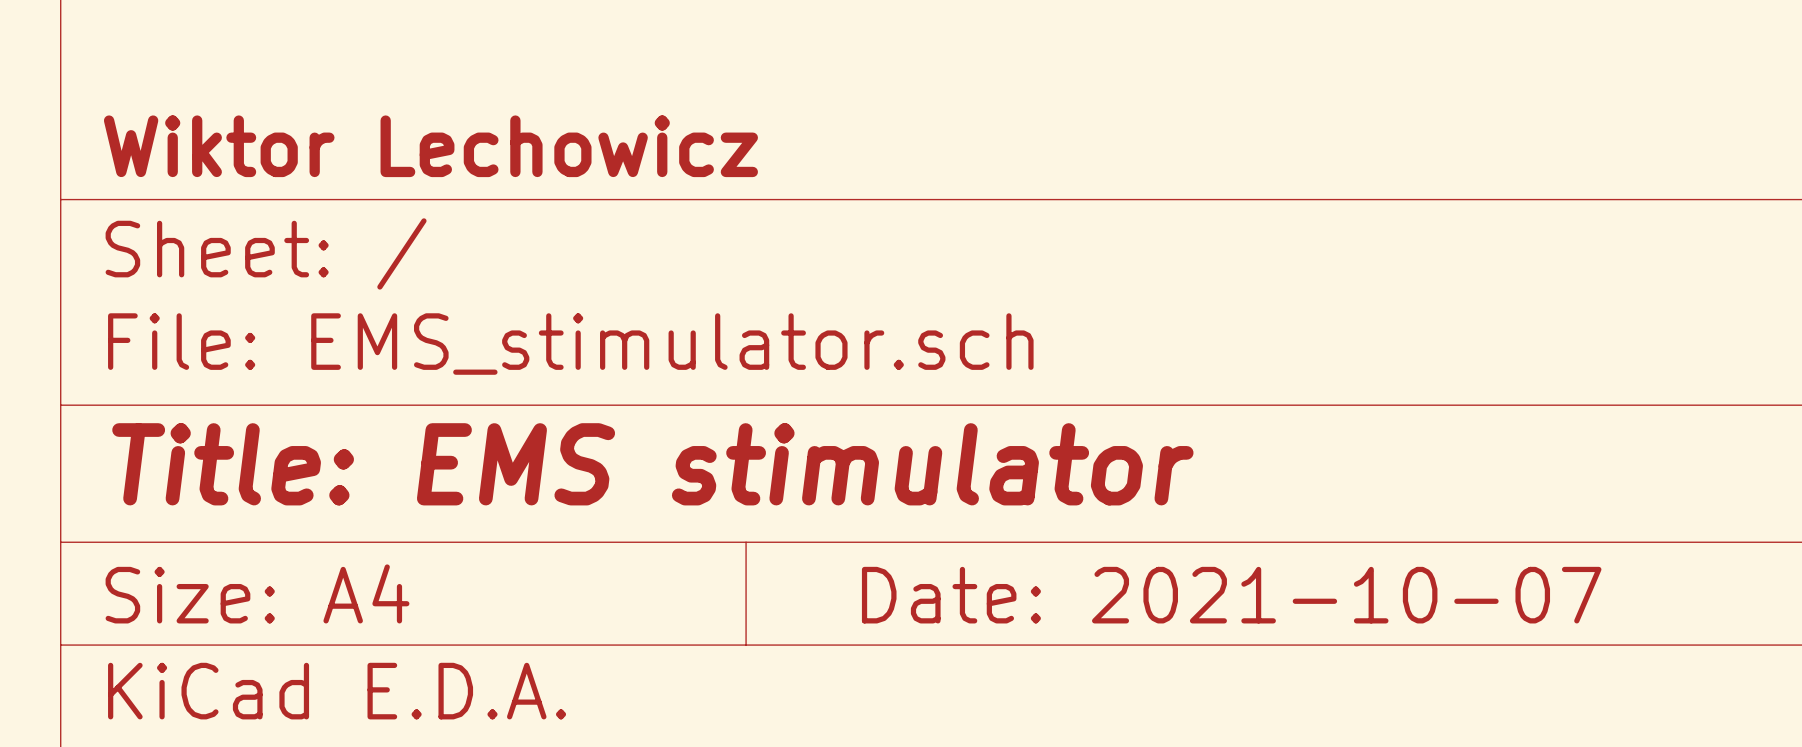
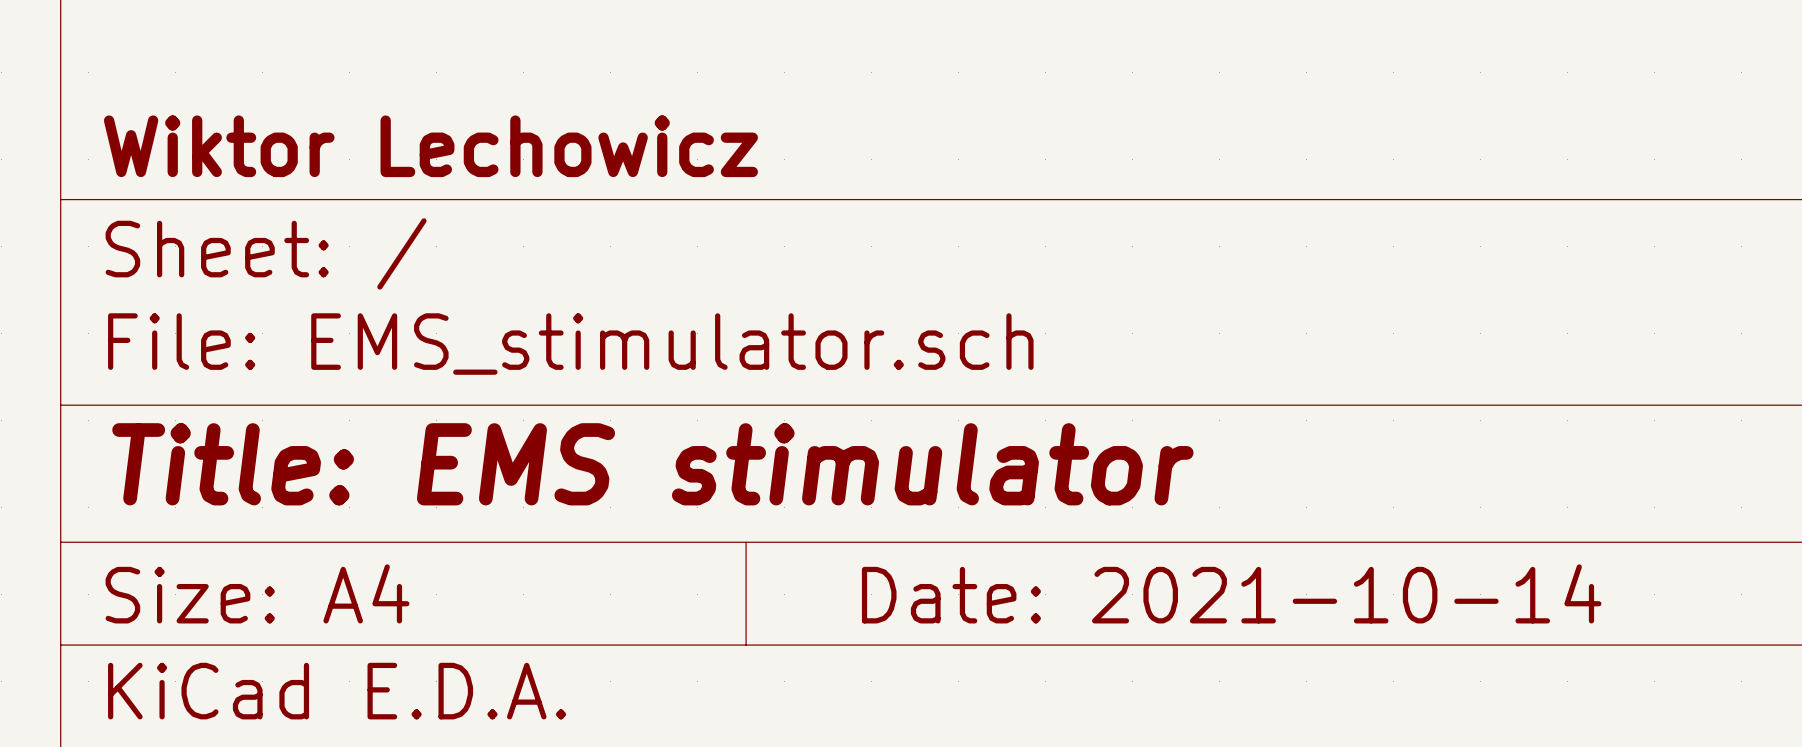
title block: Date: 2021-10-07 (1231, 595) -> Date: 2021-10-14 (1231, 593)

